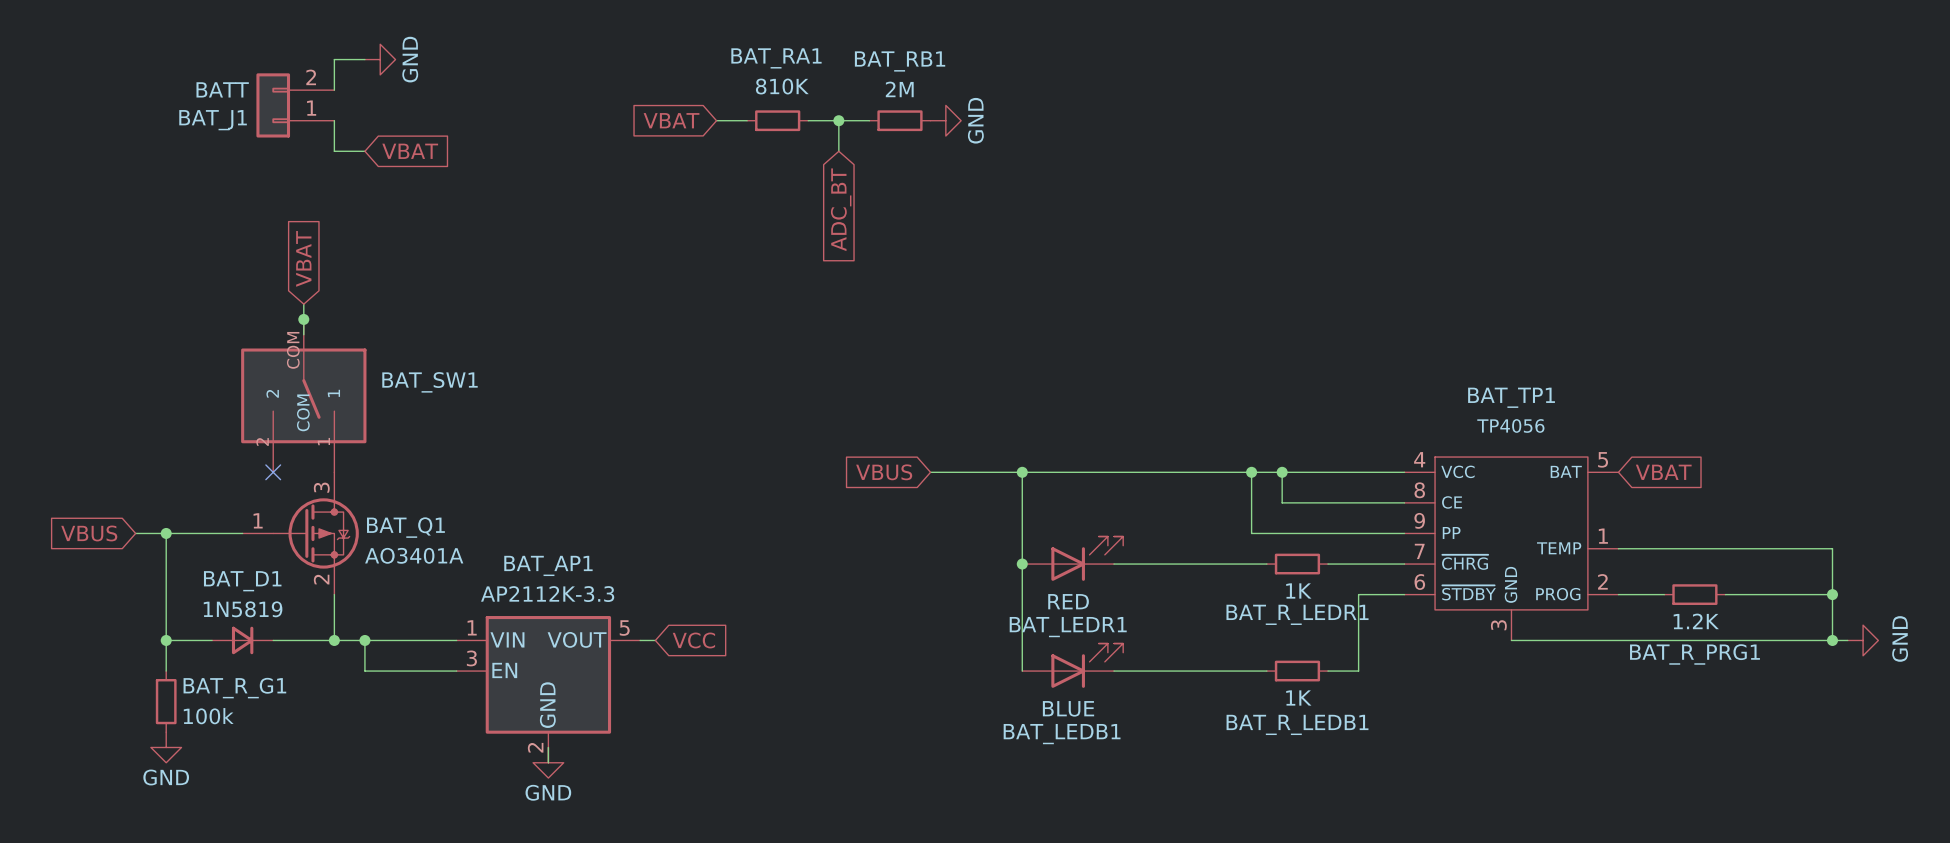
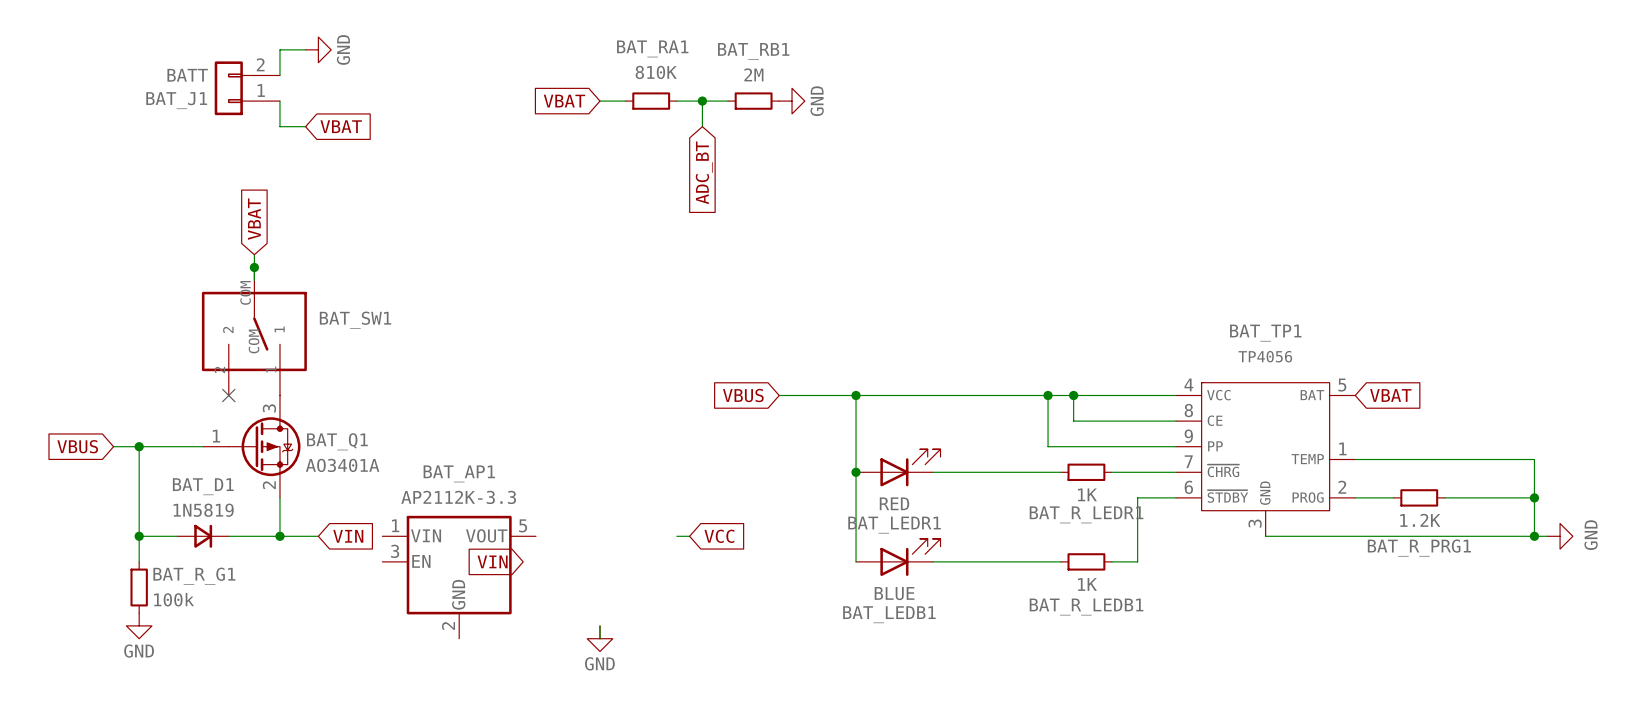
wire: (364, 640) (364, 671) (456, 671) -> none
junction: (364, 640) -> none
wire: (380, 640) (456, 640) -> none
global label: none -> VIN (348, 536)
wire: (640, 640) (655, 640) -> (676, 536) (689, 536)
global label position: VCC (693, 640) -> VCC (719, 536)
global label: none -> VIN (492, 561)
power symbol position: GND (548, 762) -> GND (600, 638)

